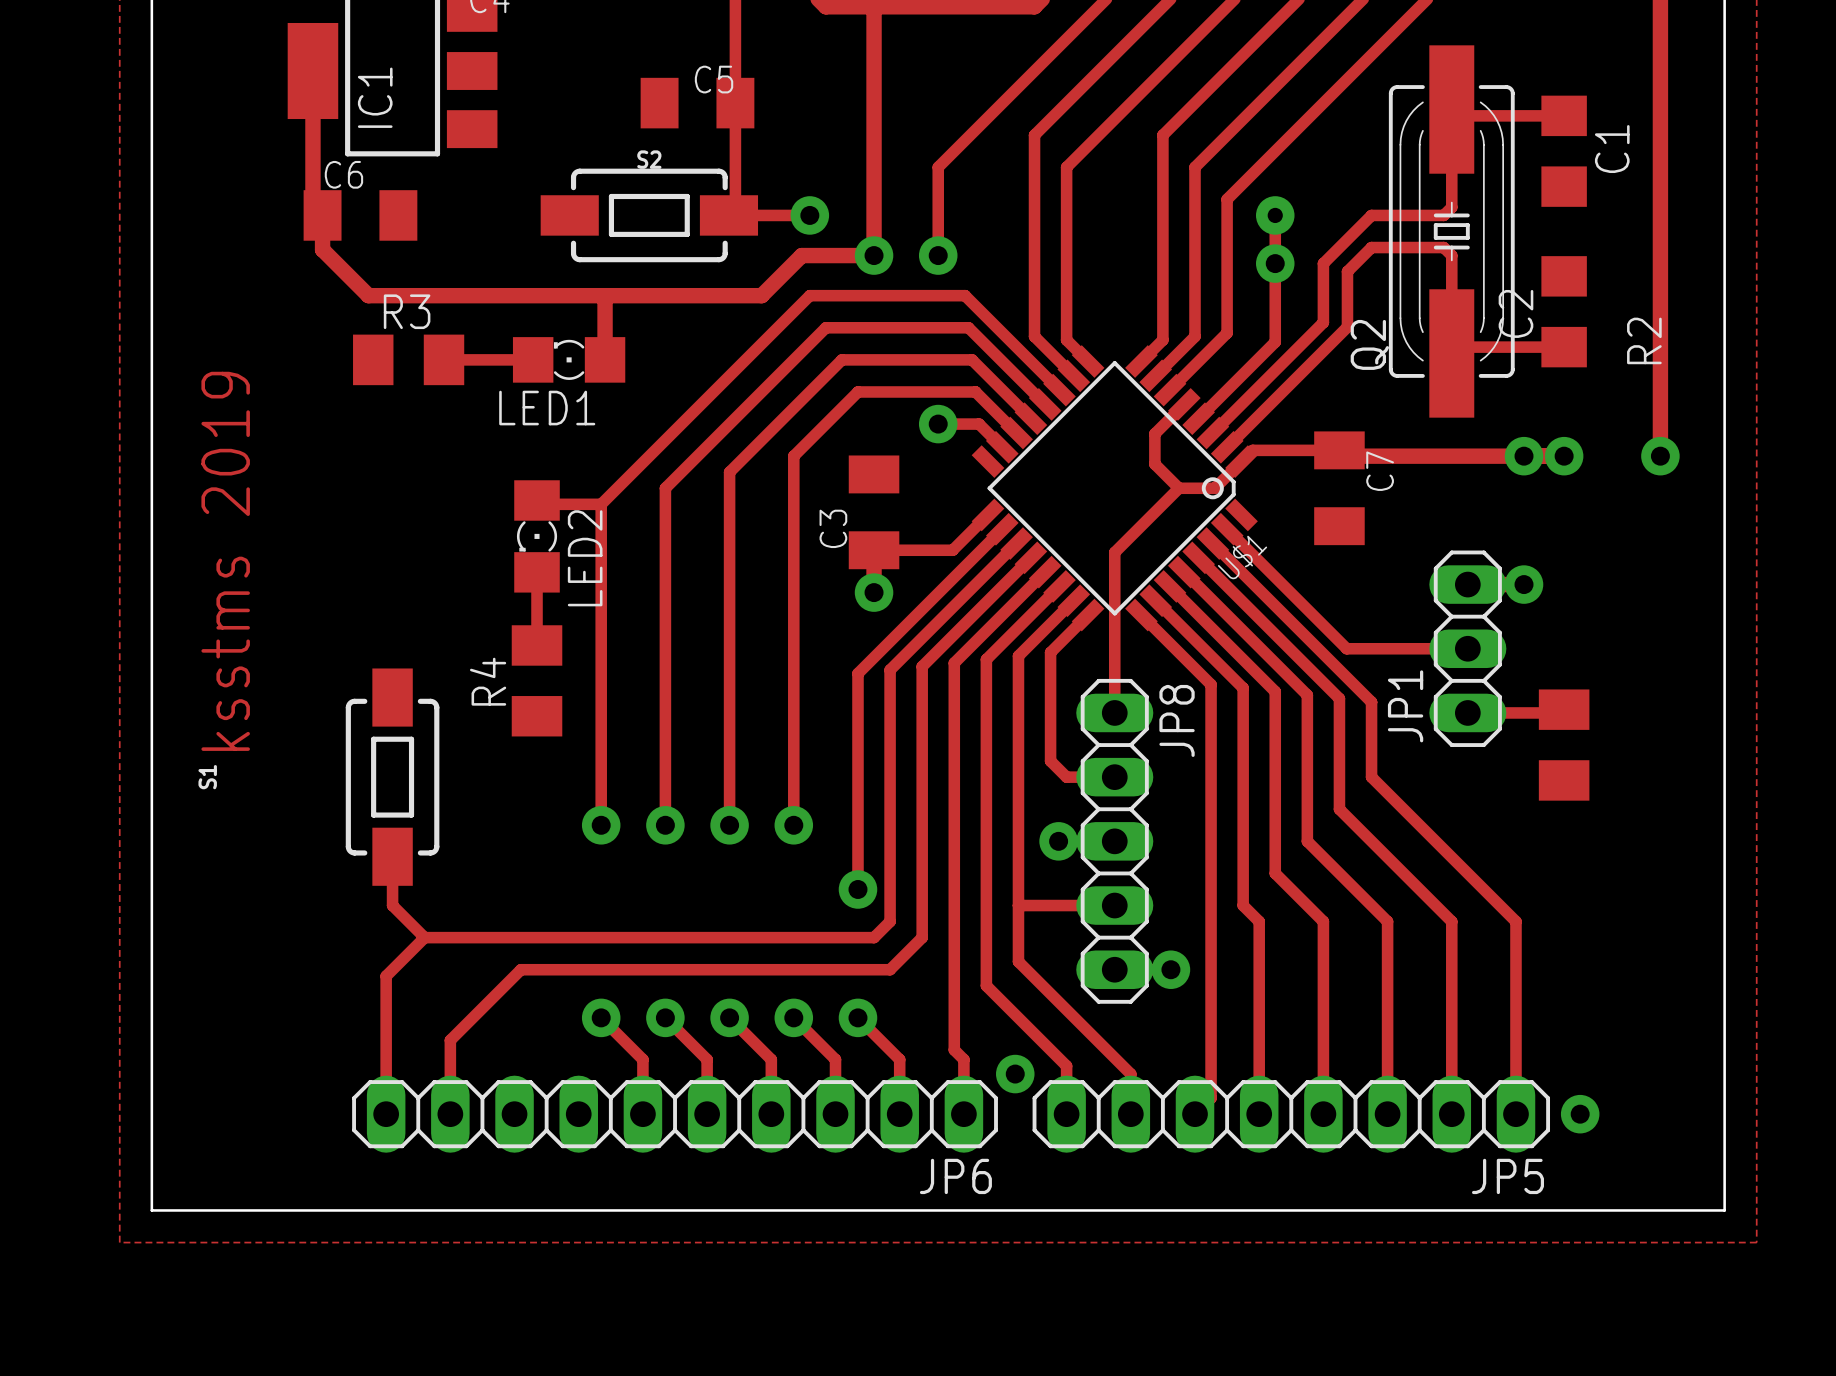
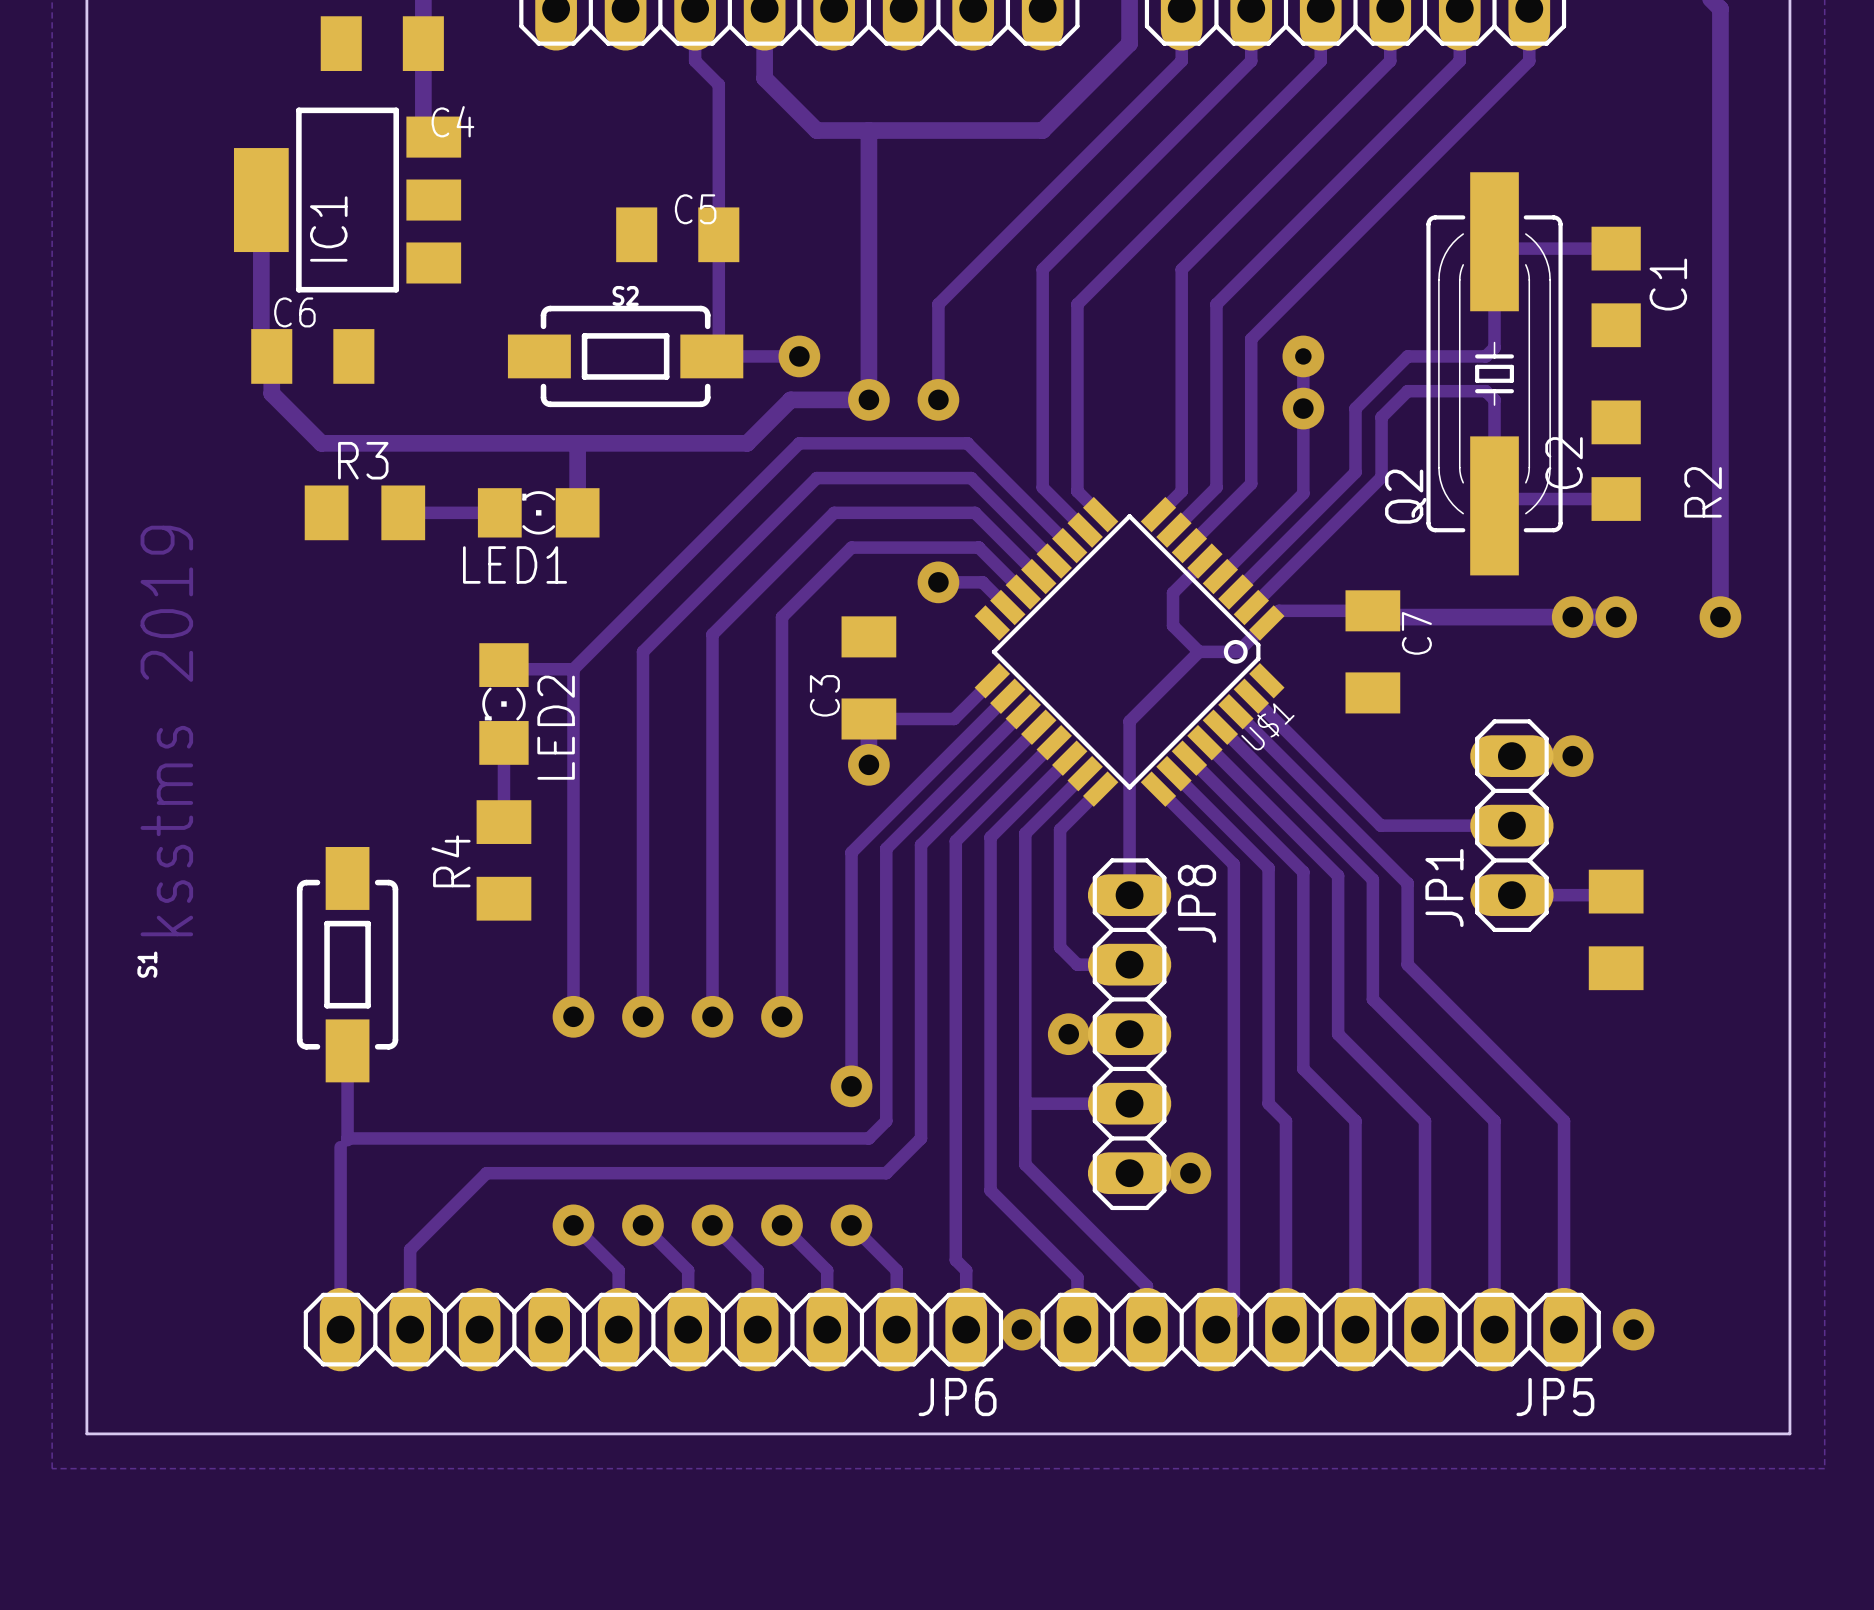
track: (392, 905) (424, 937) (386, 976) -> (347, 1103) (347, 1140)
track: none -> (347, 1138) (382, 1138)
track: none -> (340, 1147) (340, 1180)
via position: (1015, 1074) -> (1021, 1329)

